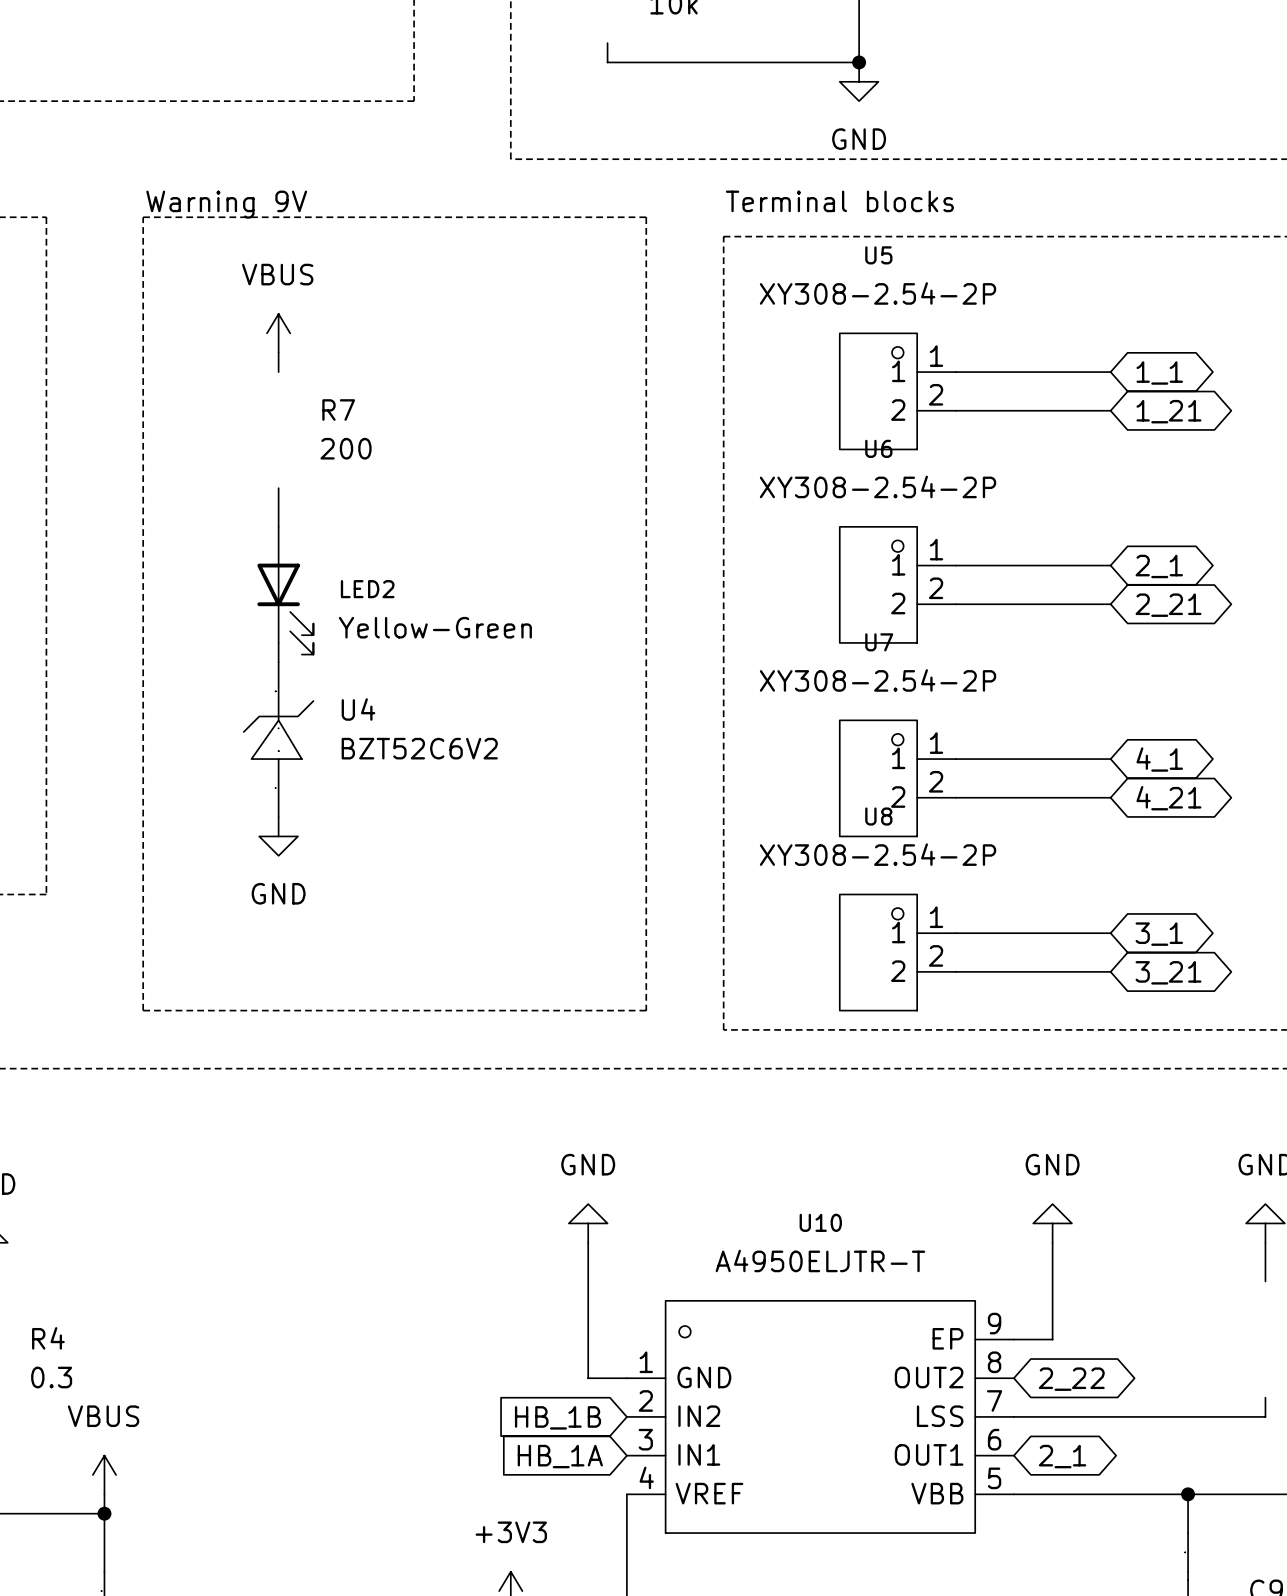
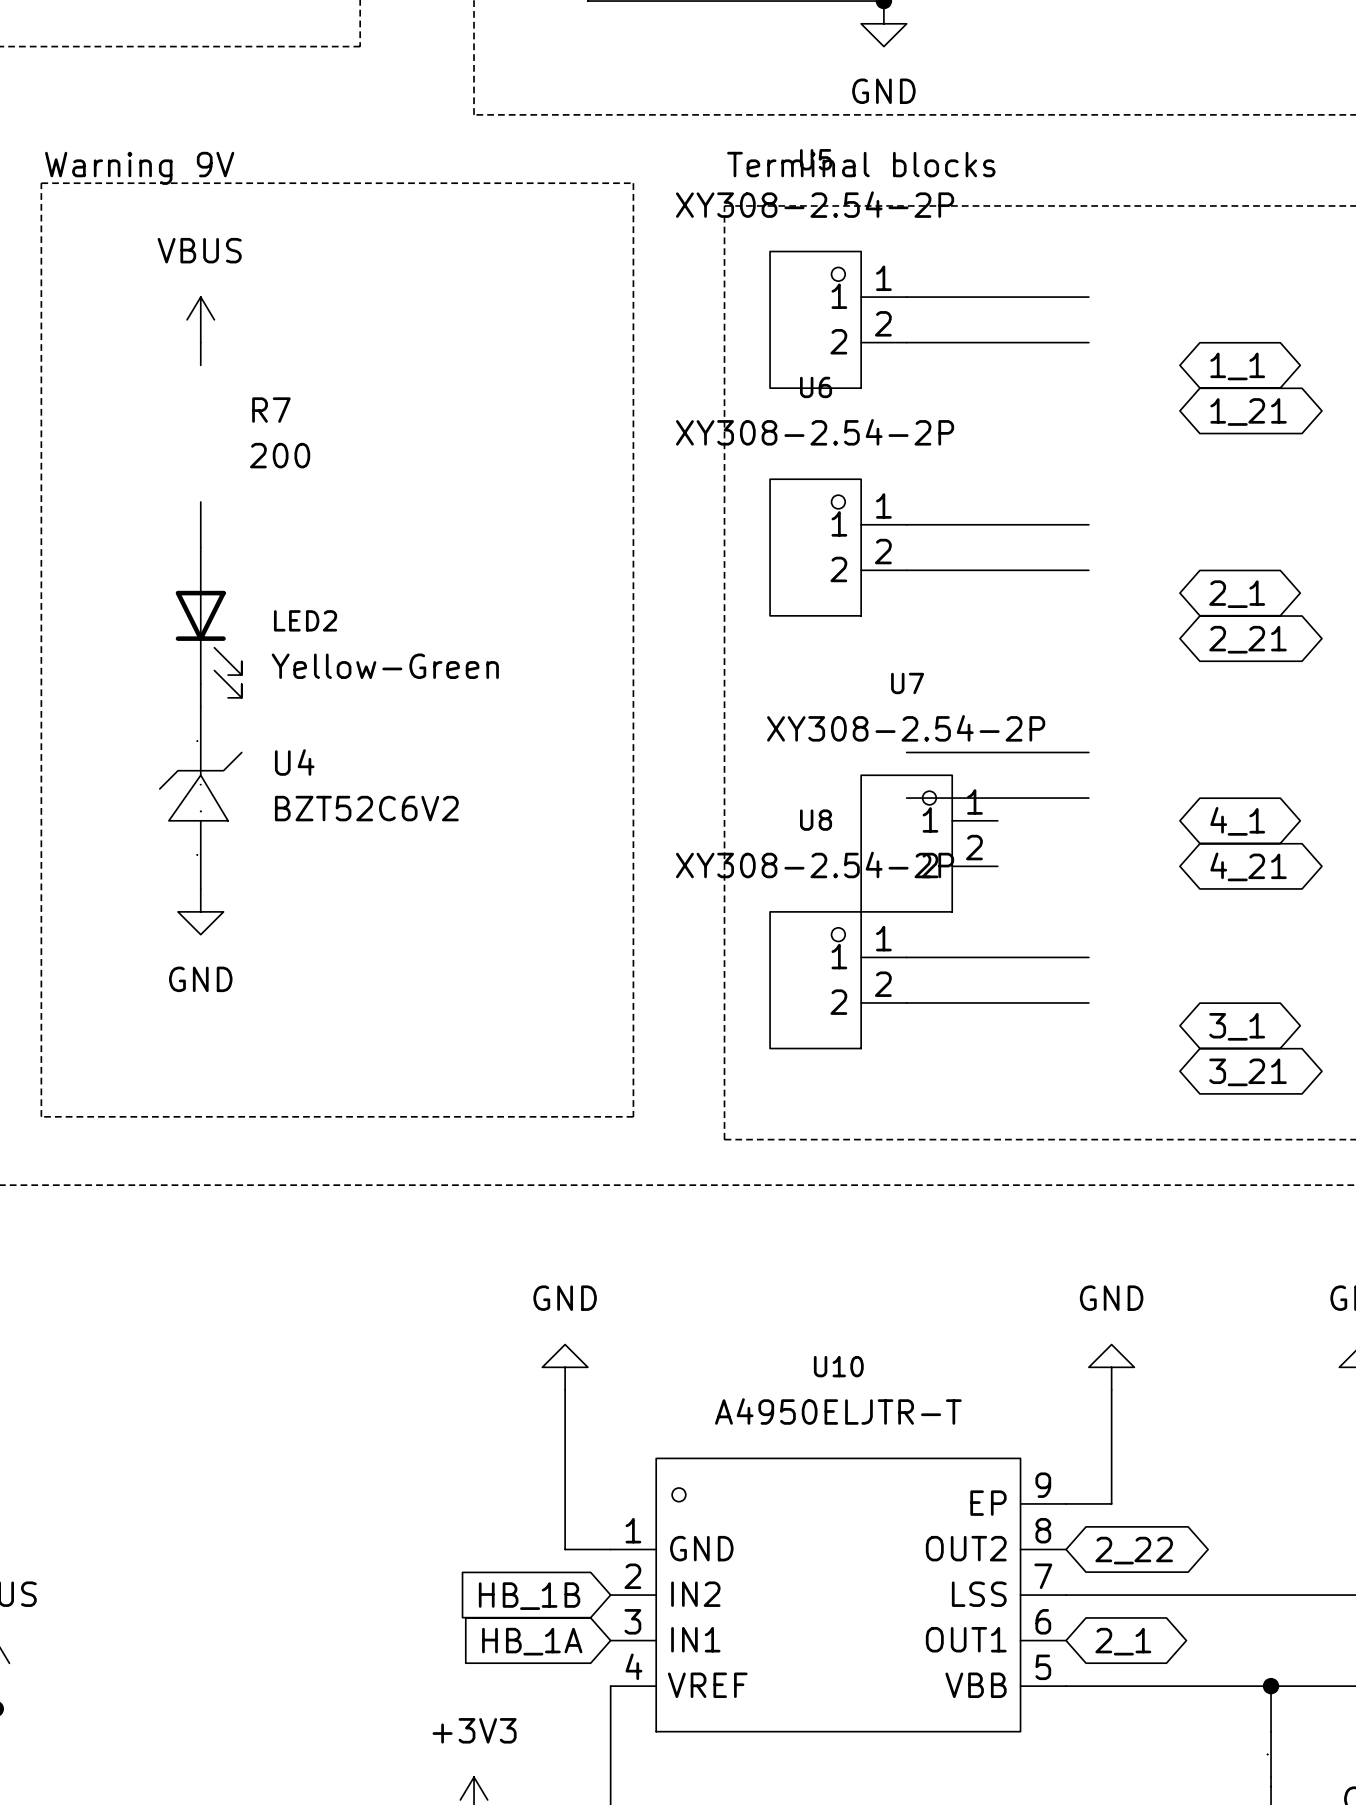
wire: (955, 372) (1110, 372) -> (906, 297) (1088, 297)
U5 position: (897, 391) -> (838, 319)
wire: (955, 410) (1110, 410) -> (906, 342) (1088, 342)
wire: (955, 565) (1110, 565) -> (906, 524) (1088, 524)
U6 position: (897, 584) -> (838, 547)
wire: (955, 604) (1110, 604) -> (906, 570) (1088, 570)
wire: (955, 759) (1110, 759) -> (906, 752) (1088, 752)
wire: (955, 797) (1110, 797) -> (906, 798) (1088, 798)
wire: (955, 933) (1110, 933) -> (906, 957) (1088, 957)
U8 position: (897, 952) -> (838, 980)
wire: (955, 971) (1110, 971) -> (906, 1002) (1088, 1002)

